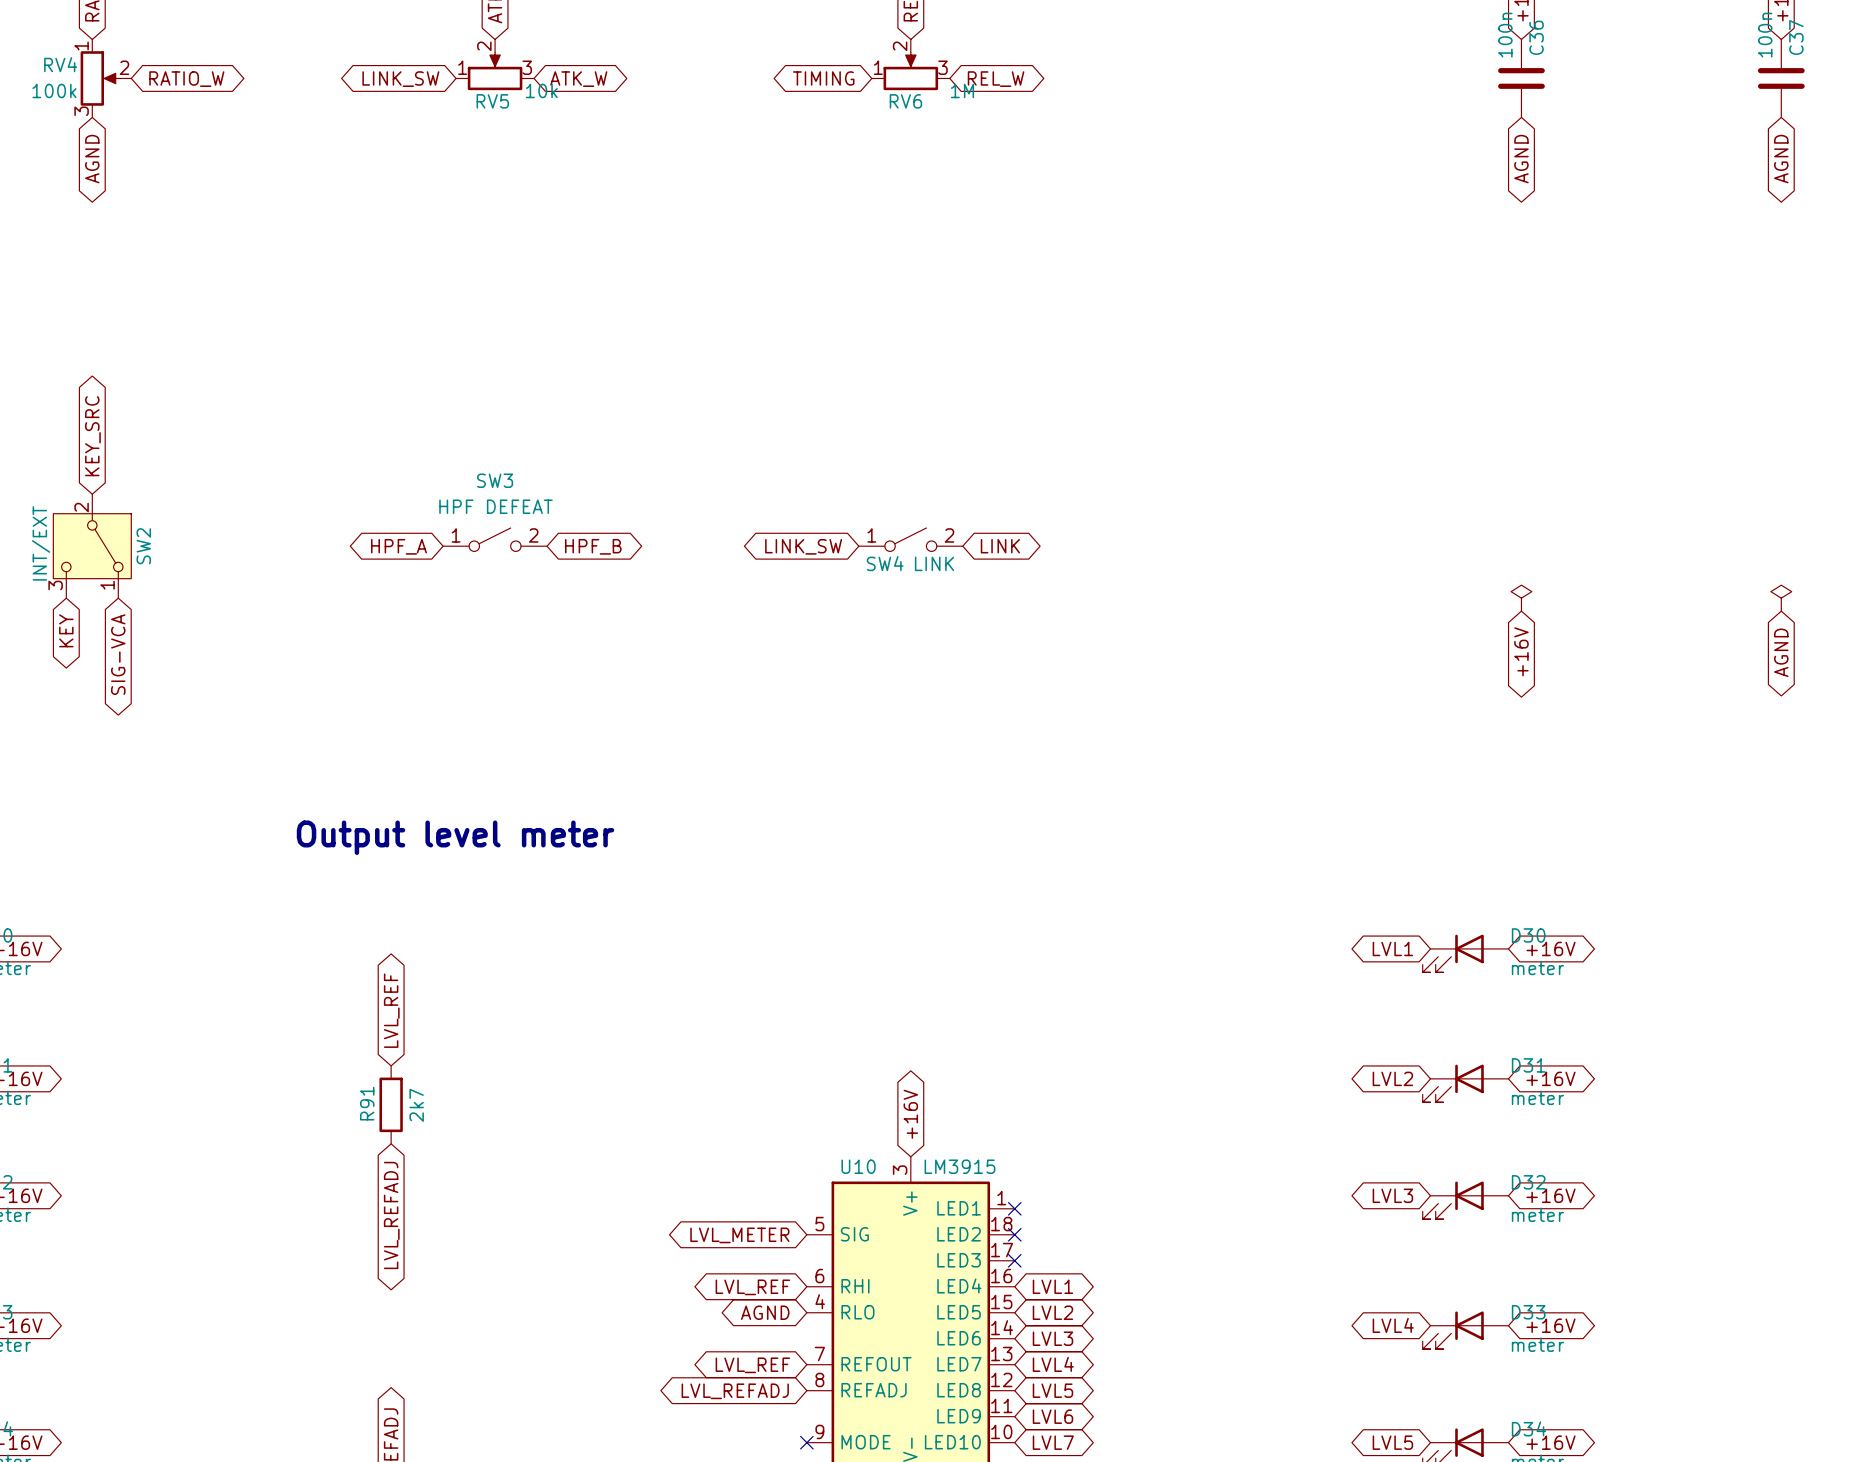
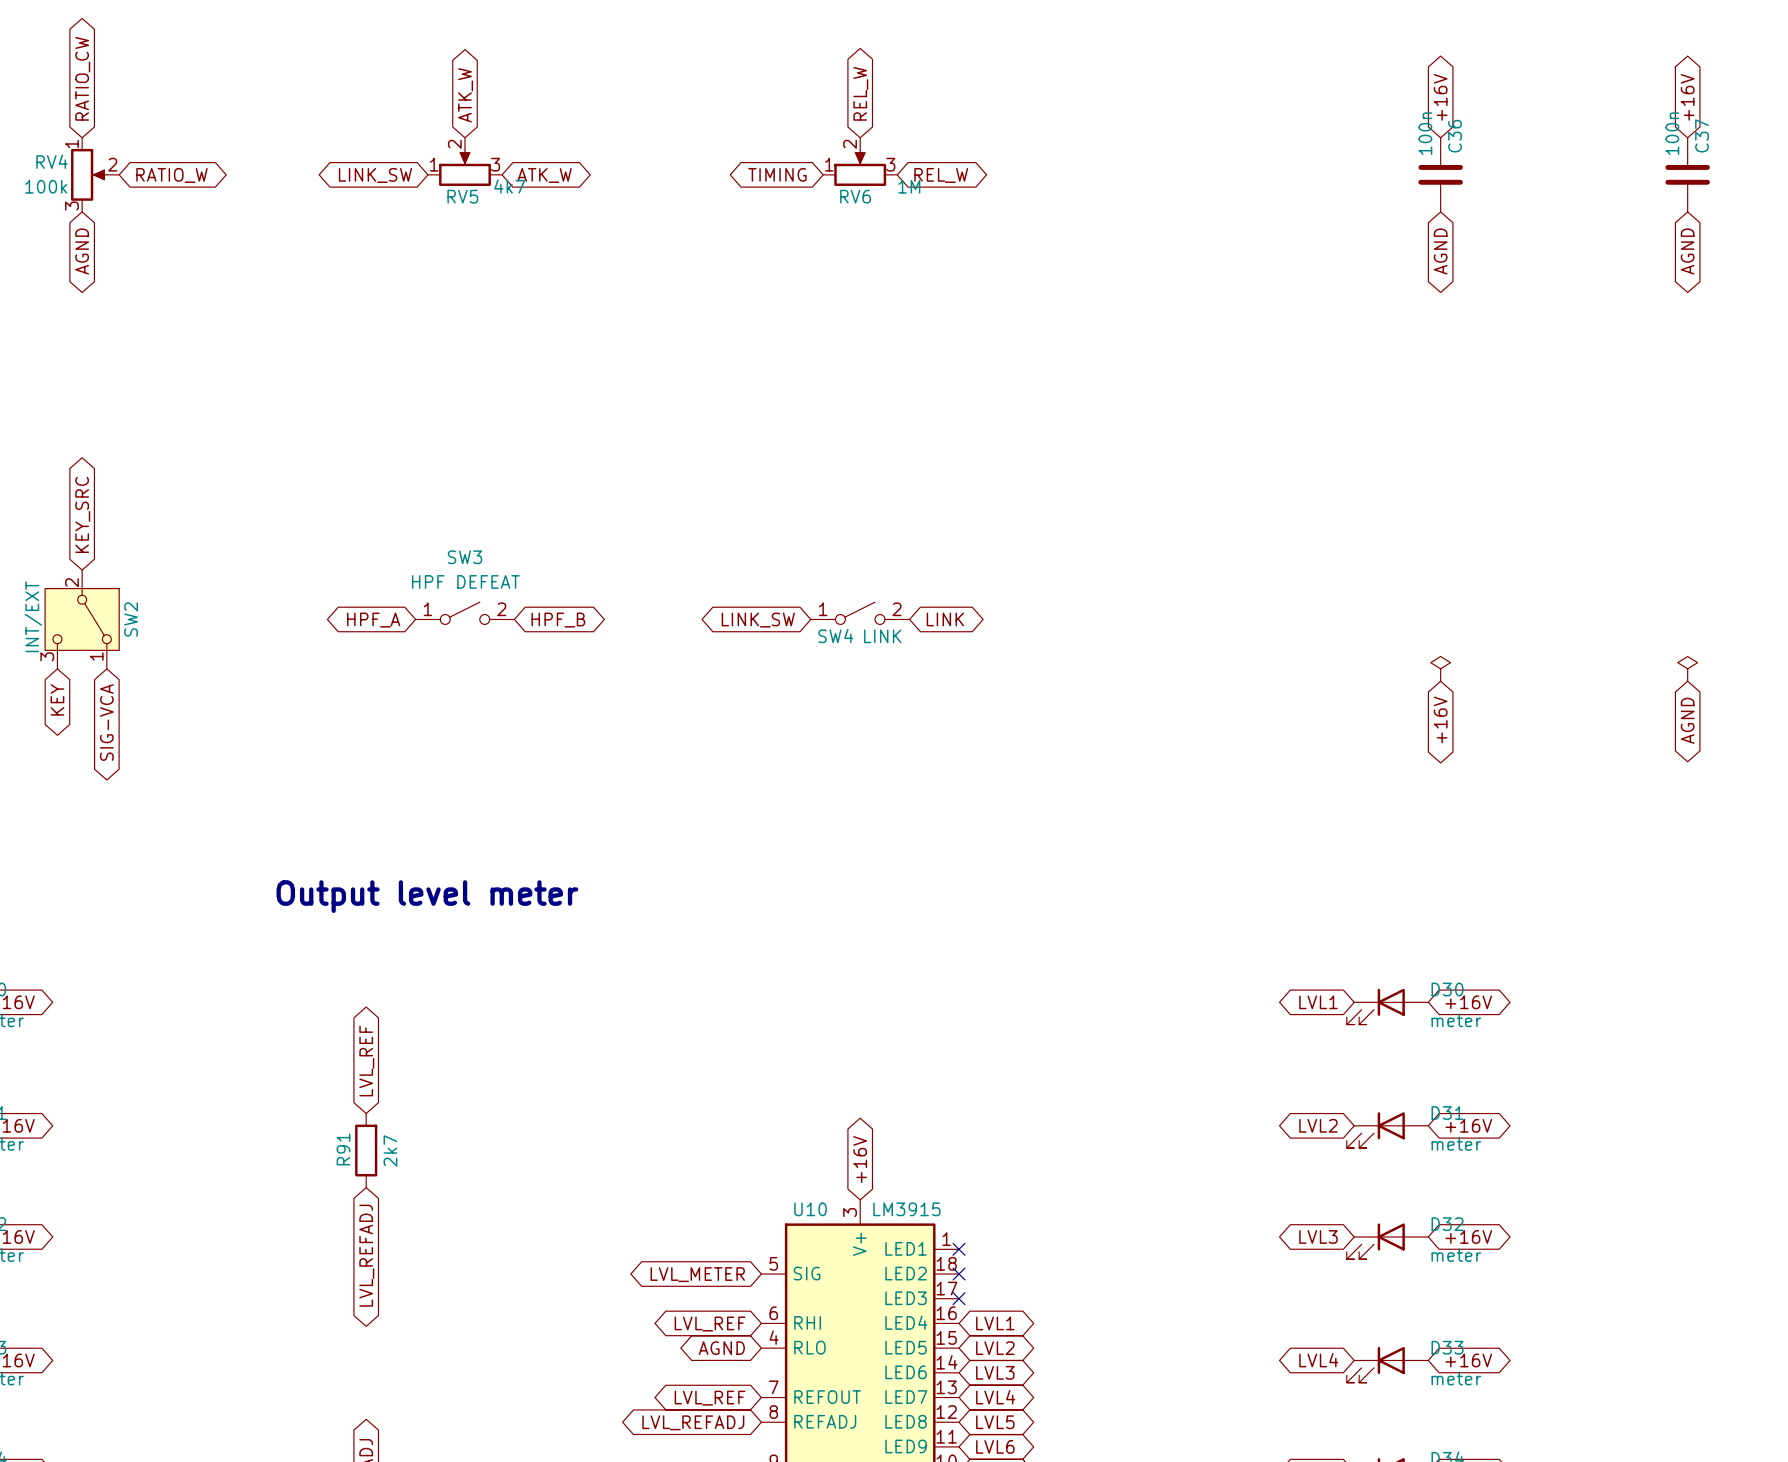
RV5 value: 10k (541, 90) -> 4k7 (509, 186)

